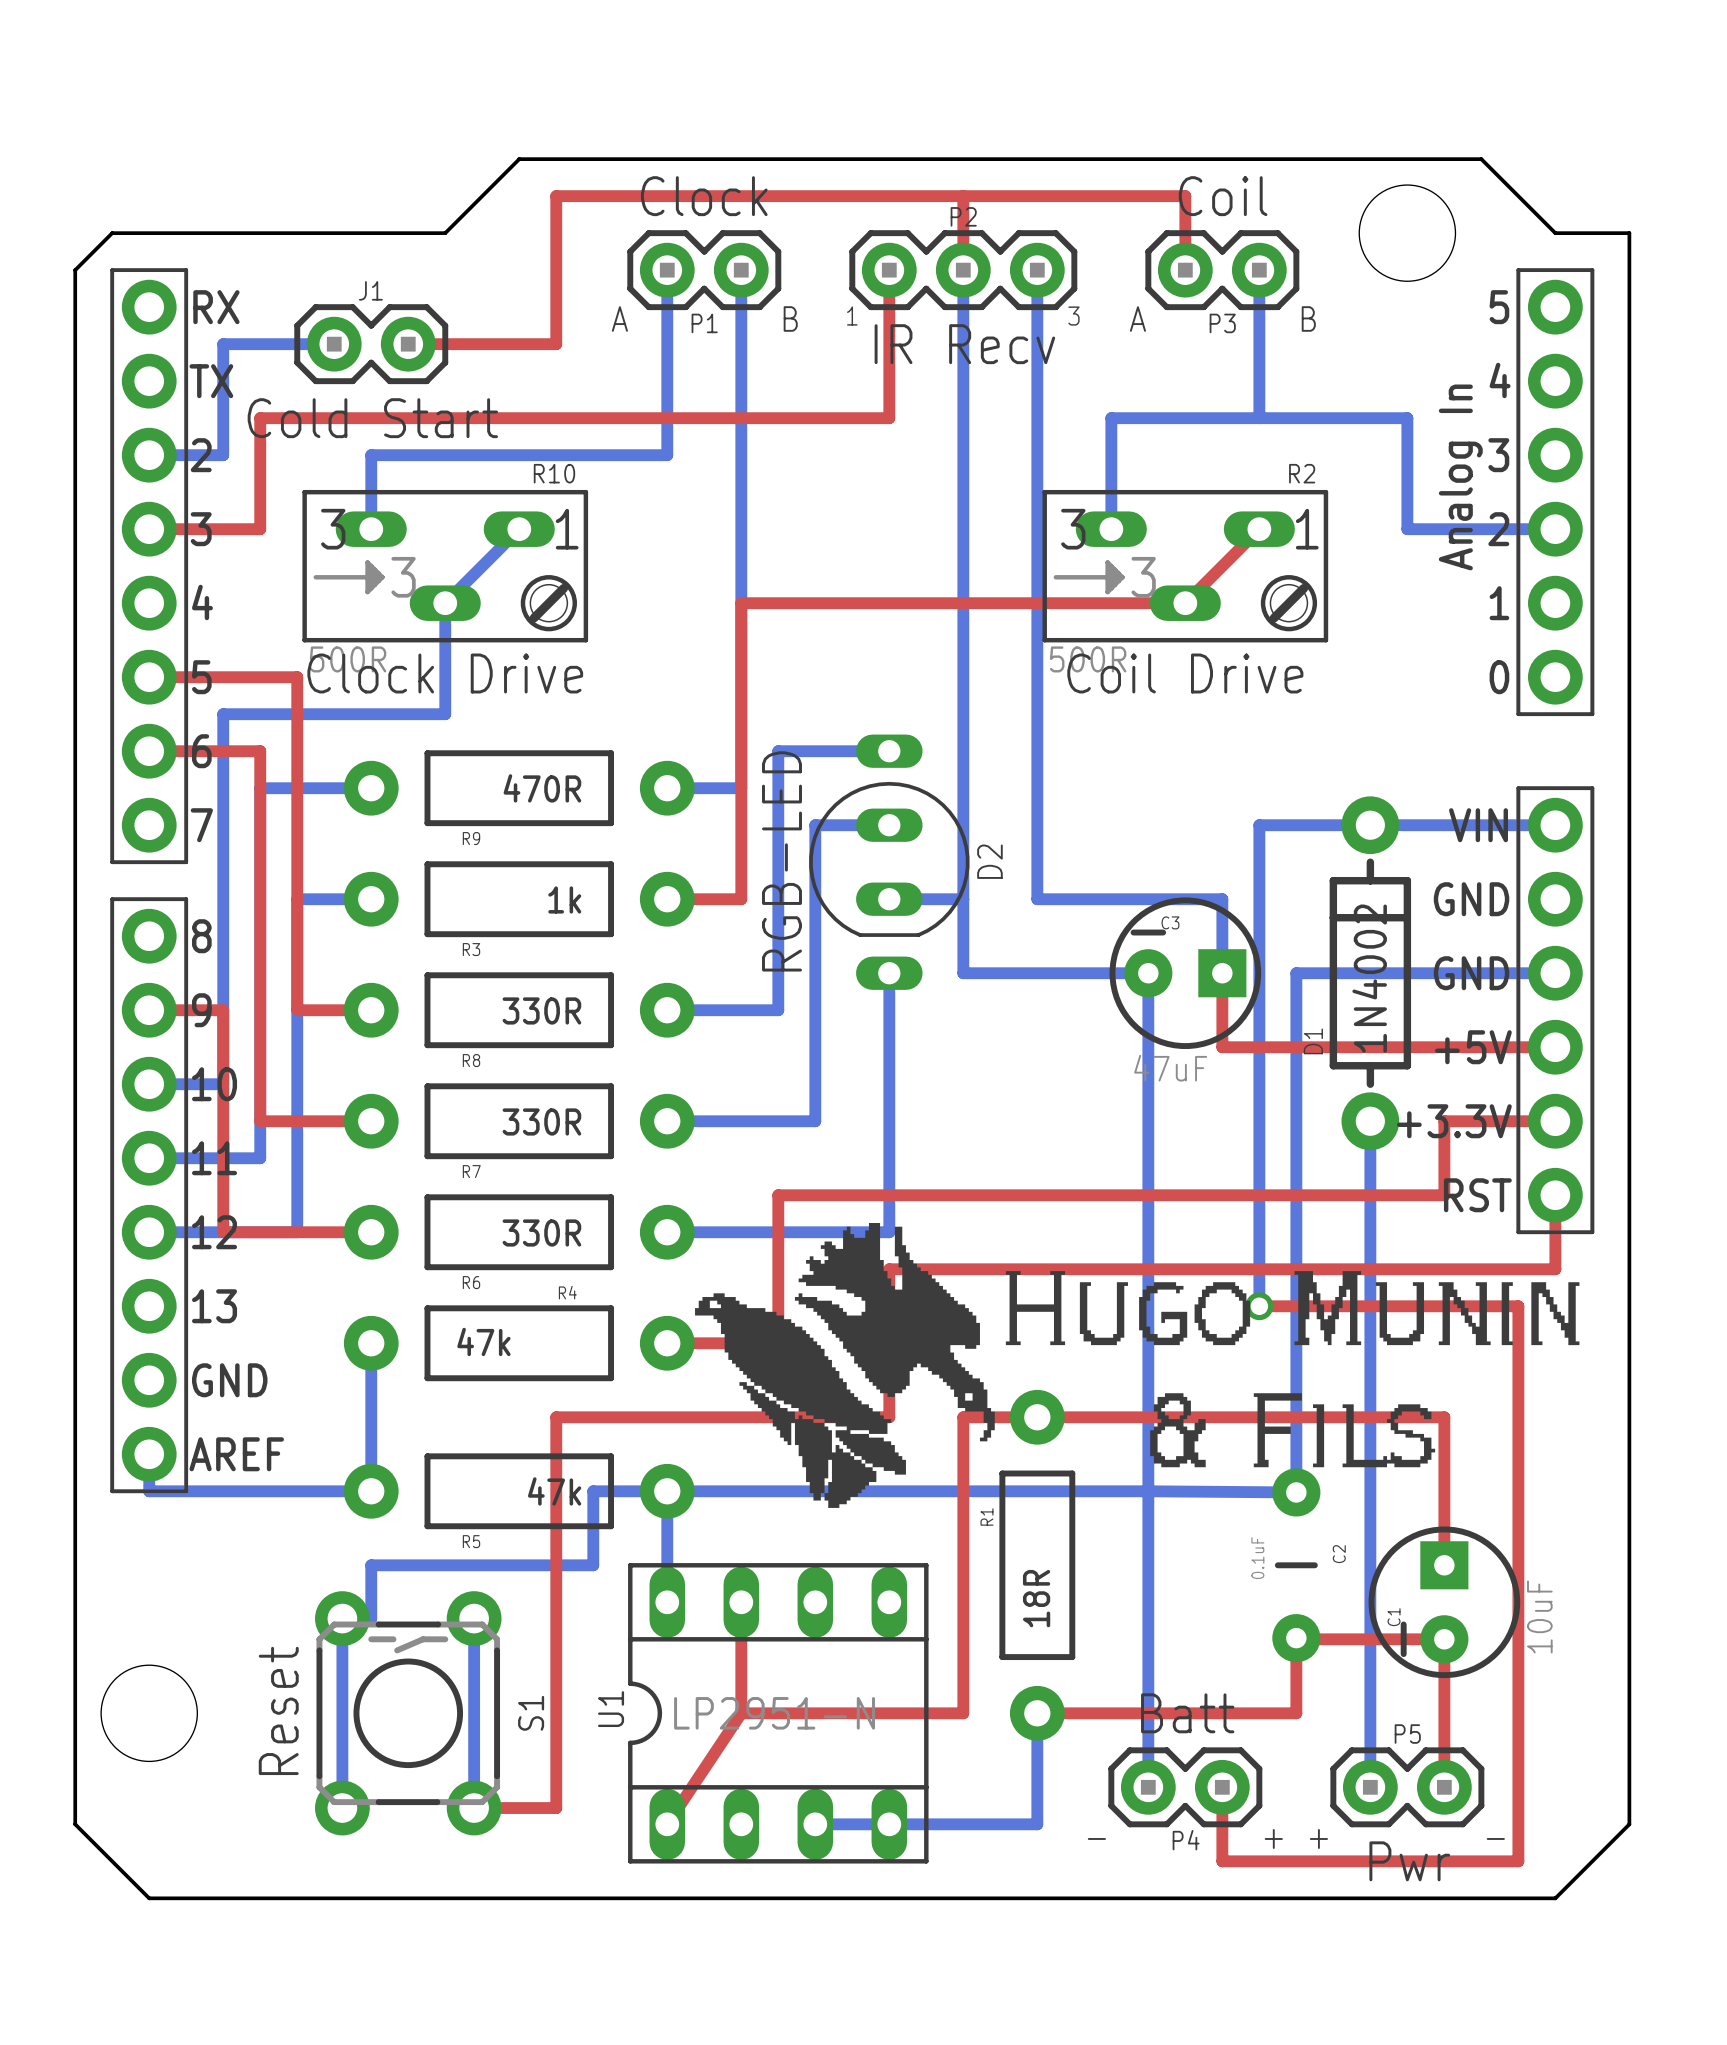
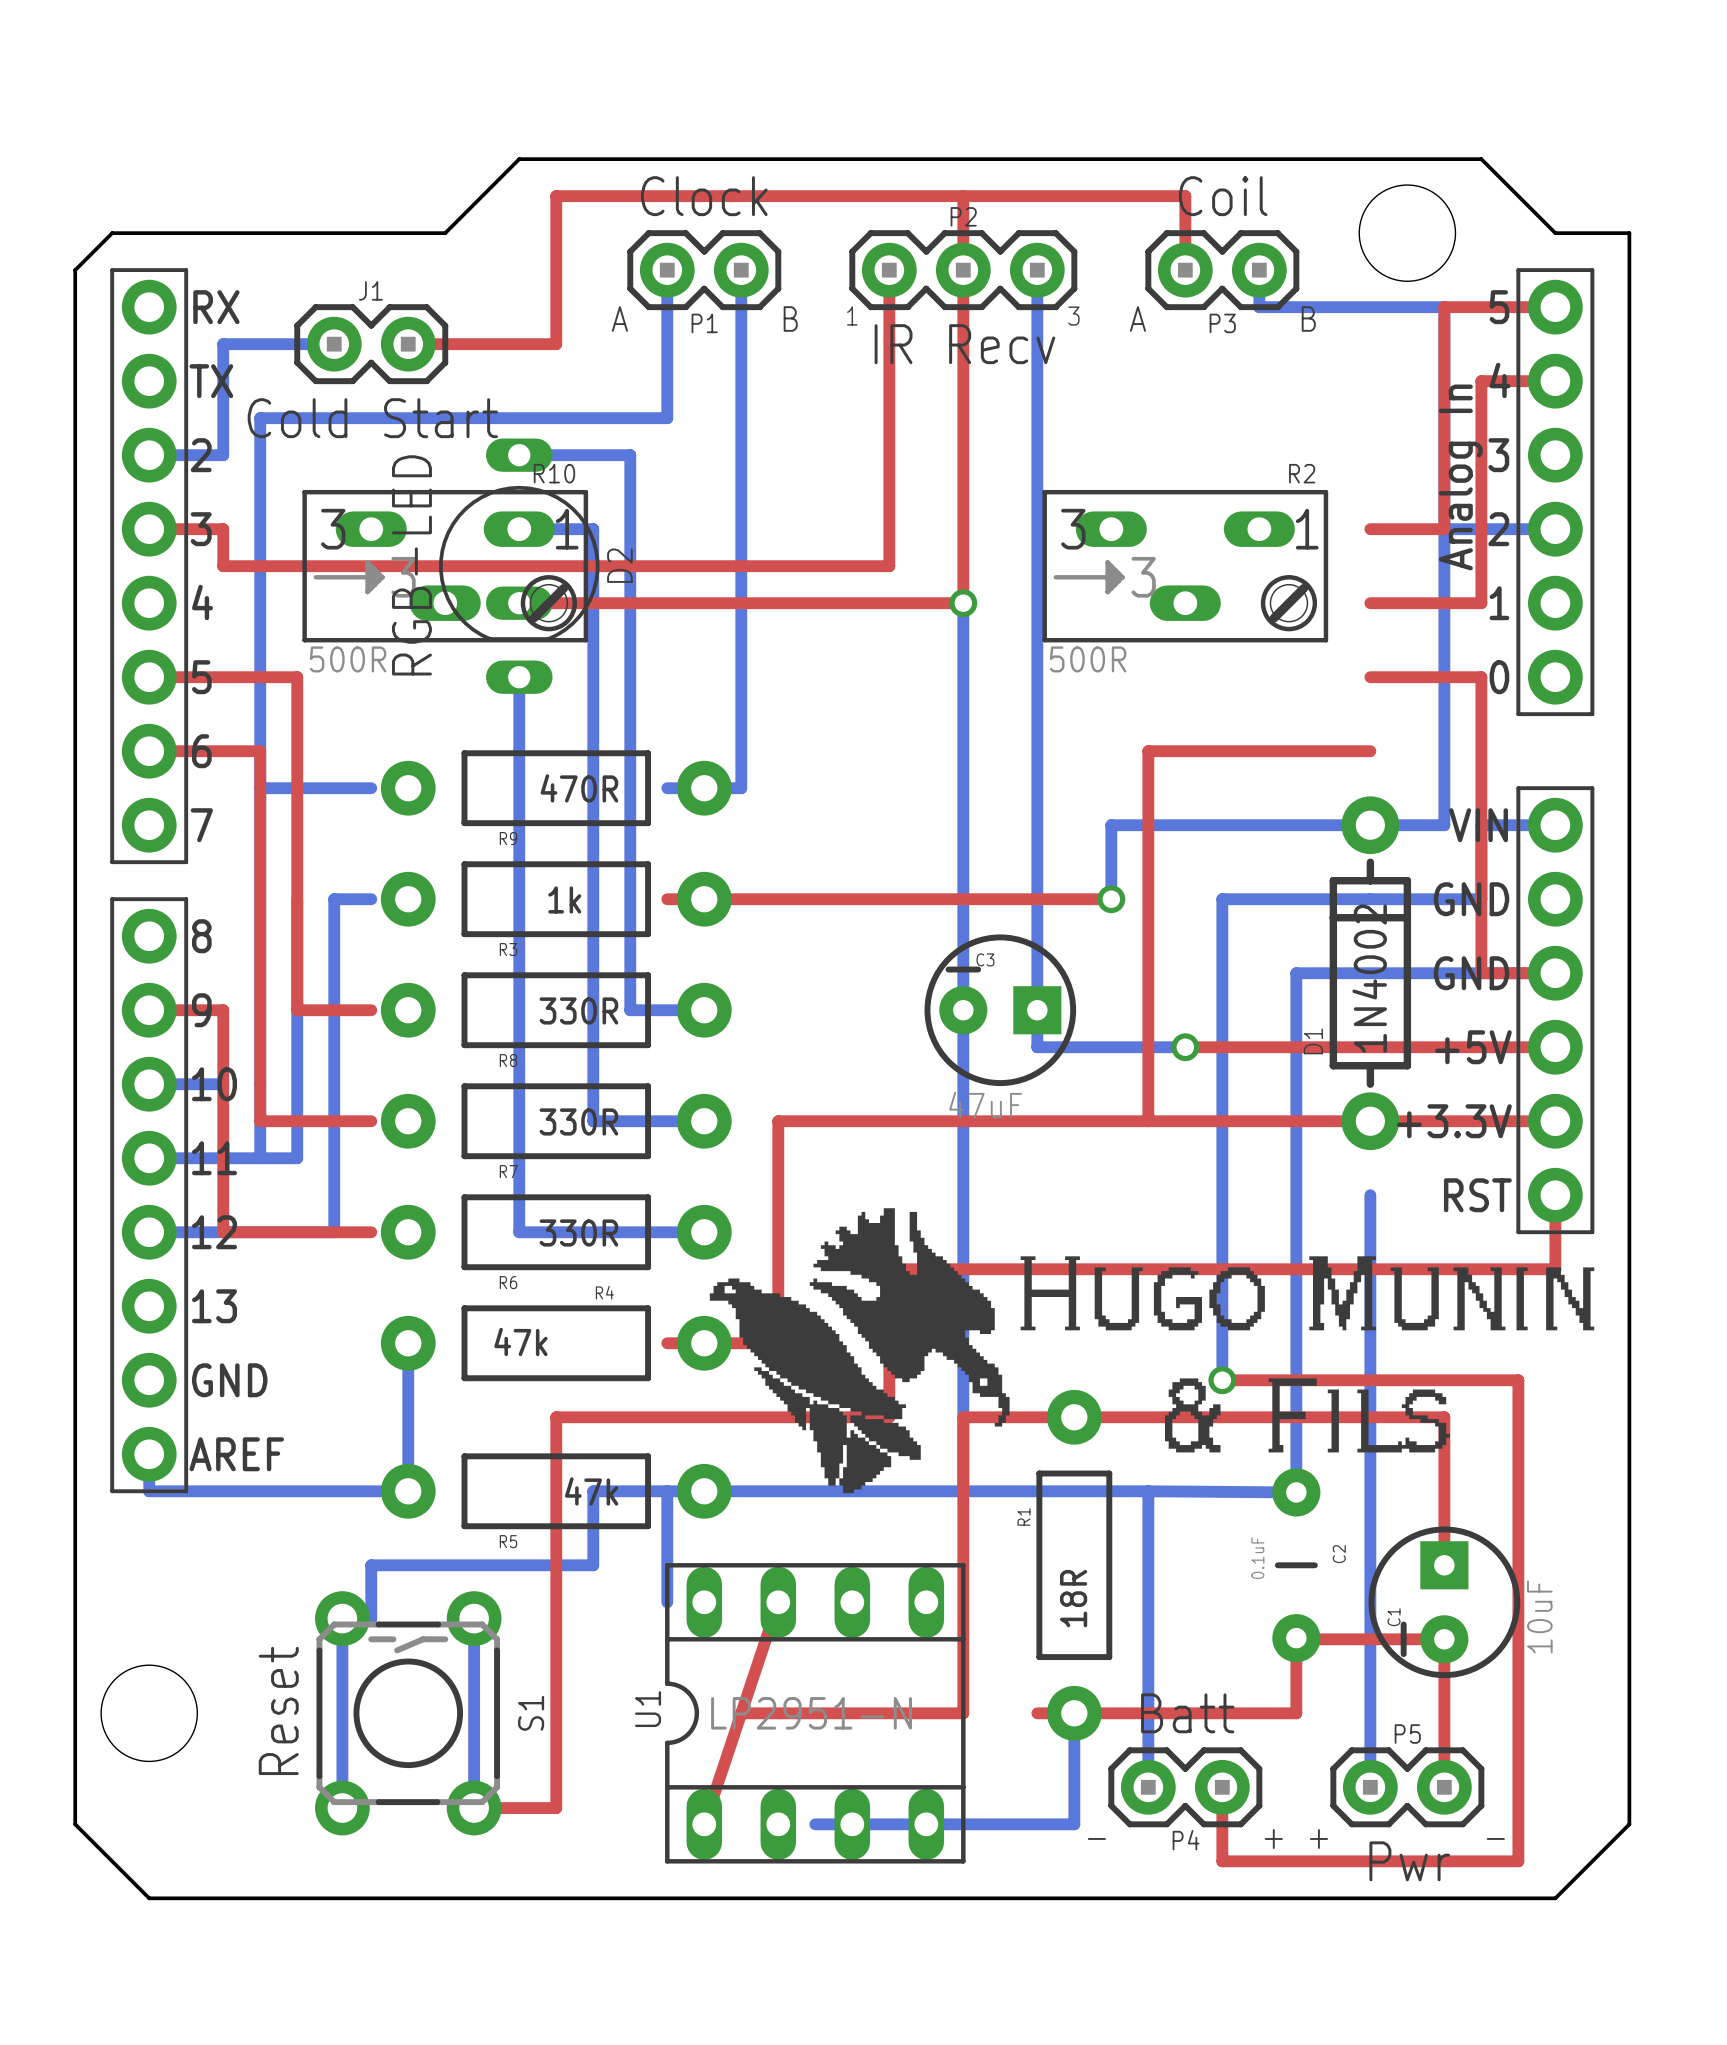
bottom track: (963, 270) (963, 603) -> none
bottom track: (1259, 307) (1259, 418) -> (1259, 307) (1444, 307) (1444, 825)
top track: none -> (1555, 307) (1444, 307) (1444, 529) (1370, 529)
top track: none -> (1555, 381) (1481, 381) (1481, 603) (1370, 603)
bottom track: (667, 418) (667, 455) (630, 455) -> (667, 418) (260, 418) (260, 788)
top track: (889, 418) (260, 418) (260, 529) (223, 529) -> (889, 418) (889, 566) (223, 566) (223, 529)
bottom track: (519, 455) (371, 455) (371, 529) -> none
bottom track: none -> (630, 455) (630, 1010) (667, 1010)
bottom track: (519, 529) (445, 603) (445, 714) (223, 714) (223, 1084) -> (519, 529) (593, 529) (593, 1121) (667, 1121)
bottom track: (1111, 529) (1111, 418) (1407, 418) (1407, 529) (1444, 529) -> none
top track: (1259, 529) (1185, 603) (963, 603) -> (963, 270) (963, 603)
top track: (741, 603) (741, 899) -> (741, 603) (519, 603)
via: none -> (963, 603)
text: Clock Drive (445, 673) -> none
text: Coil Drive (1185, 673) -> none
bottom track: none -> (519, 677) (519, 1232) (667, 1232)
top track: none -> (1370, 677) (1481, 677) (1481, 973) (1555, 973)
bottom track: (889, 751) (778, 751) (778, 1010) (704, 1010) -> none
top track: none -> (1370, 751) (1148, 751) (1148, 1121)
R9 position: (519, 788) -> (556, 788)
bottom track: (889, 825) (815, 825) (815, 1121) (704, 1121) -> none
bottom track: (1259, 825) (1259, 1306) -> (1259, 825) (1111, 825) (1111, 899)
bottom track: (1444, 825) (1481, 825) -> (1222, 899) (1481, 899) (1481, 825)
D2 position: (889, 862) -> (519, 566)
bottom track: (297, 899) (334, 899) -> (297, 1232) (334, 1232) (334, 899)
R3 position: (519, 899) -> (556, 899)
top track: none -> (741, 899) (1111, 899)
bottom track: (889, 899) (963, 899) -> none
bottom track: (1037, 899) (1222, 899) -> (1037, 899) (1037, 1047) (1185, 1047)
via: none -> (1111, 899)
bottom track: (889, 973) (889, 1232) (704, 1232) -> none
bottom track: (963, 973) (1148, 973) (1148, 1491) -> (963, 973) (963, 1491)
C3 position: (1185, 973) -> (1000, 1010)
top track: (1222, 973) (1222, 1047) -> (1185, 1047) (1222, 1047)
bottom track: none -> (1222, 973) (1222, 1380)
R8 position: (519, 1010) -> (556, 1010)
via: none -> (1185, 1047)
R7 position: (519, 1121) -> (556, 1121)
bottom track: (1370, 1121) (1370, 1195) -> none
top track: (1444, 1121) (1444, 1195) (778, 1195) -> (1444, 1121) (778, 1121) (778, 1195)
bottom track: (297, 1158) (297, 1232) -> (297, 1158) (260, 1158)
R6 position: (519, 1232) -> (556, 1232)
top track: (1259, 1306) (1518, 1306) (1518, 1380) -> (1222, 1380) (1518, 1380)
via position: (1259, 1306) -> (1222, 1380)
bottom track: (371, 1343) (371, 1491) -> (408, 1343) (408, 1491) (371, 1491)
R4 position: (519, 1343) -> (556, 1343)
drawing position: (1137, 1365) -> (1152, 1350)
R5 position: (519, 1491) -> (556, 1491)
R1 position: (1037, 1565) -> (1074, 1565)
top track: (741, 1602) (741, 1713) (667, 1824) -> none
top track: none -> (778, 1602) (704, 1824)
U1 position: (778, 1713) -> (815, 1713)
bottom track: (1037, 1713) (1037, 1824) -> (1074, 1713) (1074, 1824) (1037, 1824)

